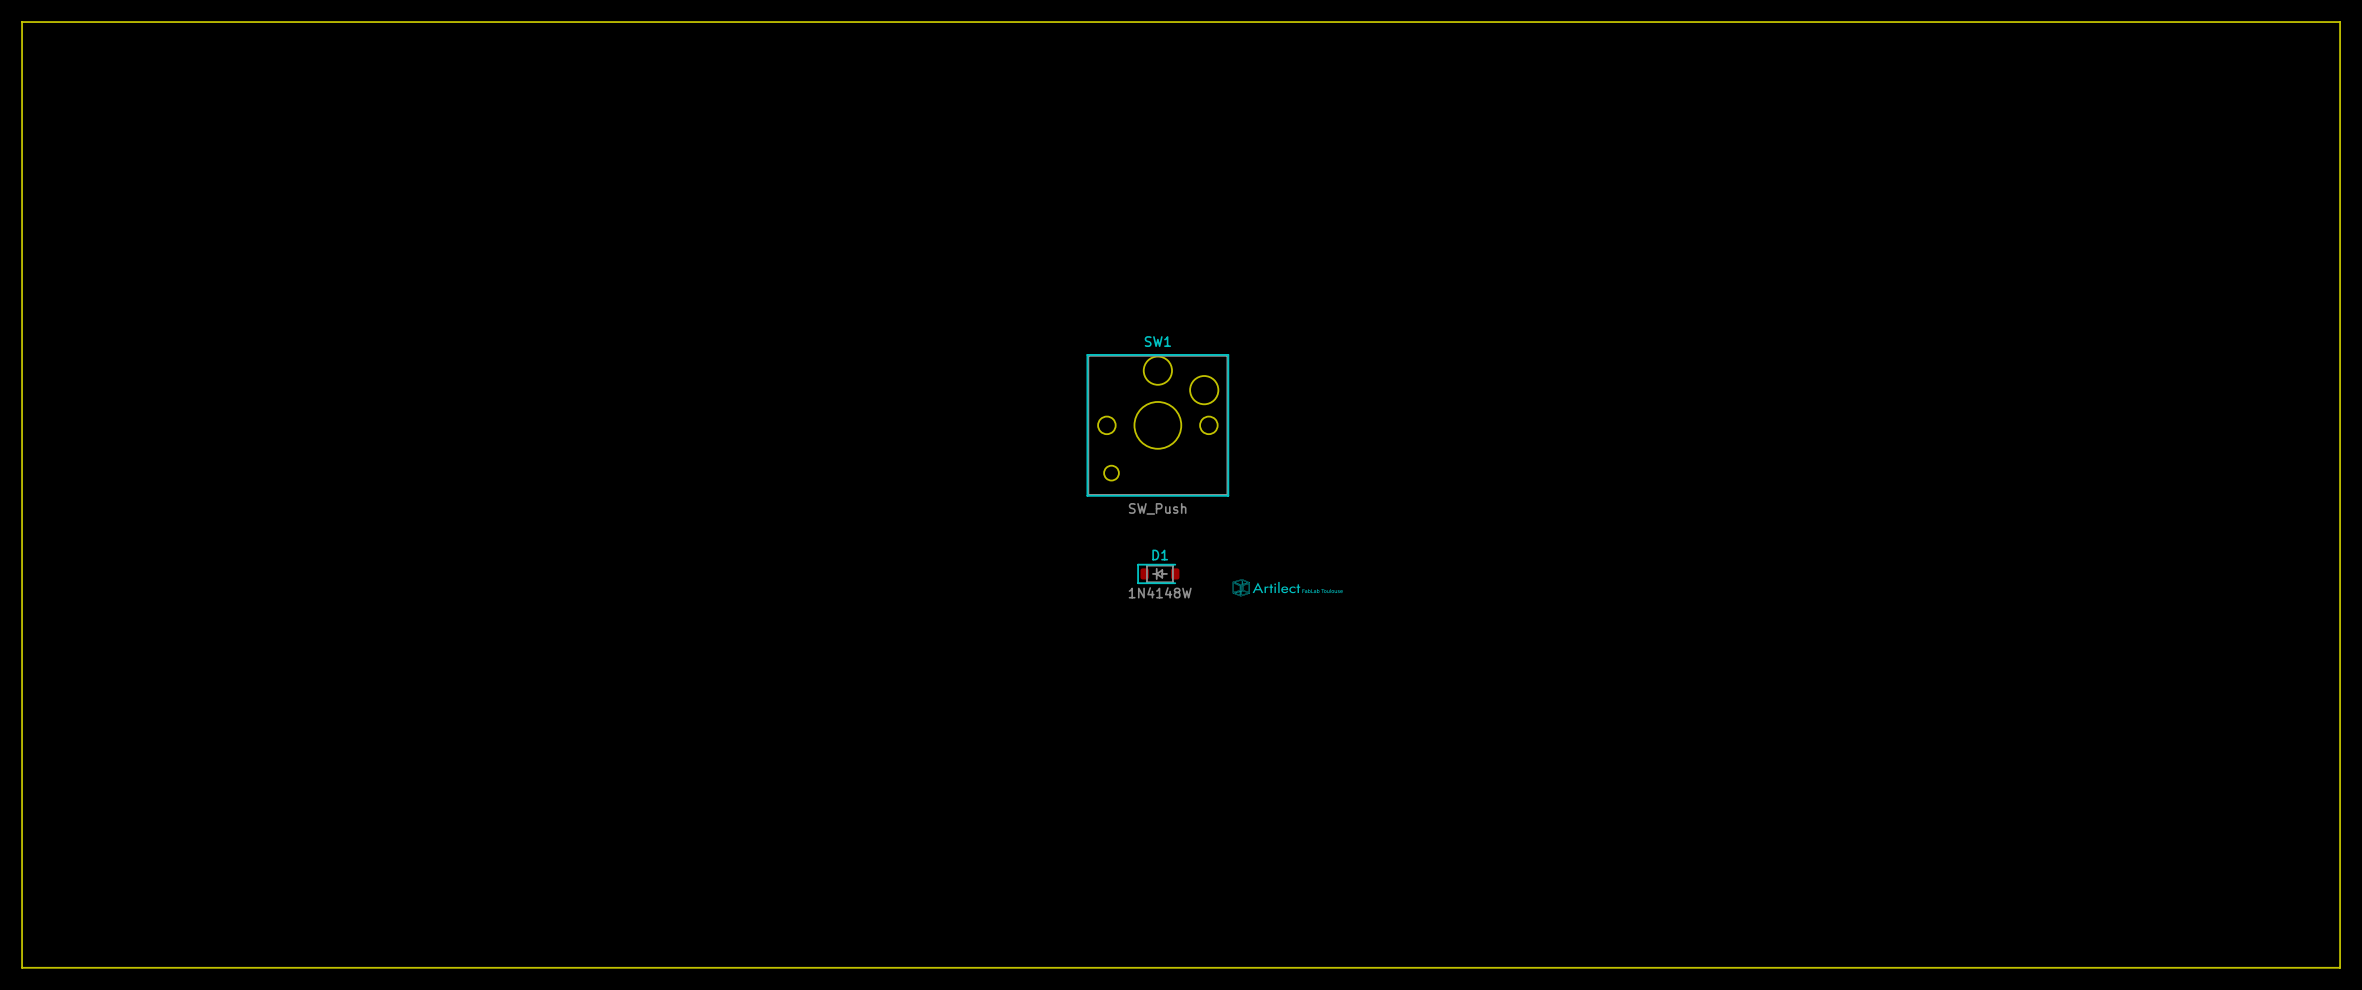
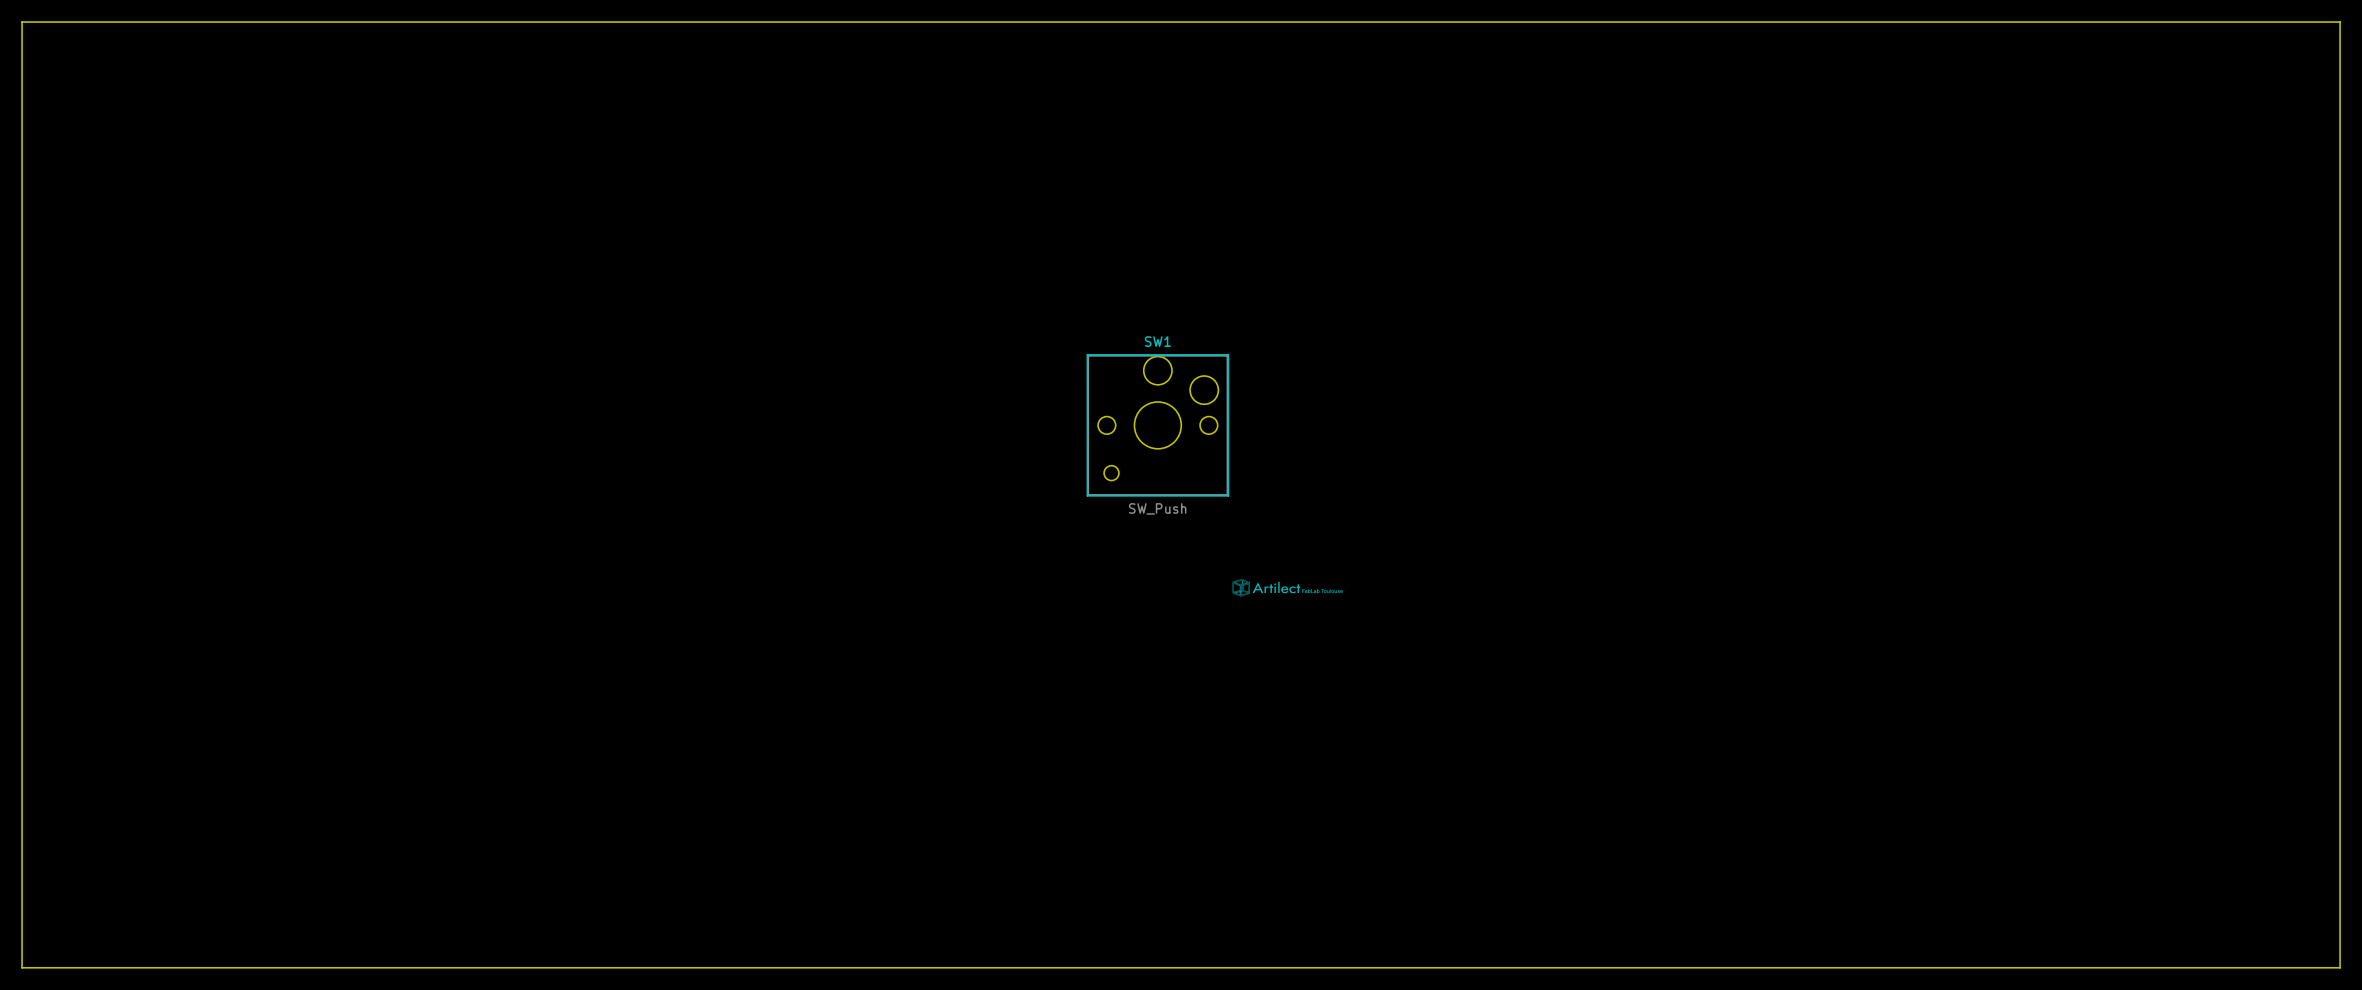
D1: 1N4148W (1158, 573) -> none

